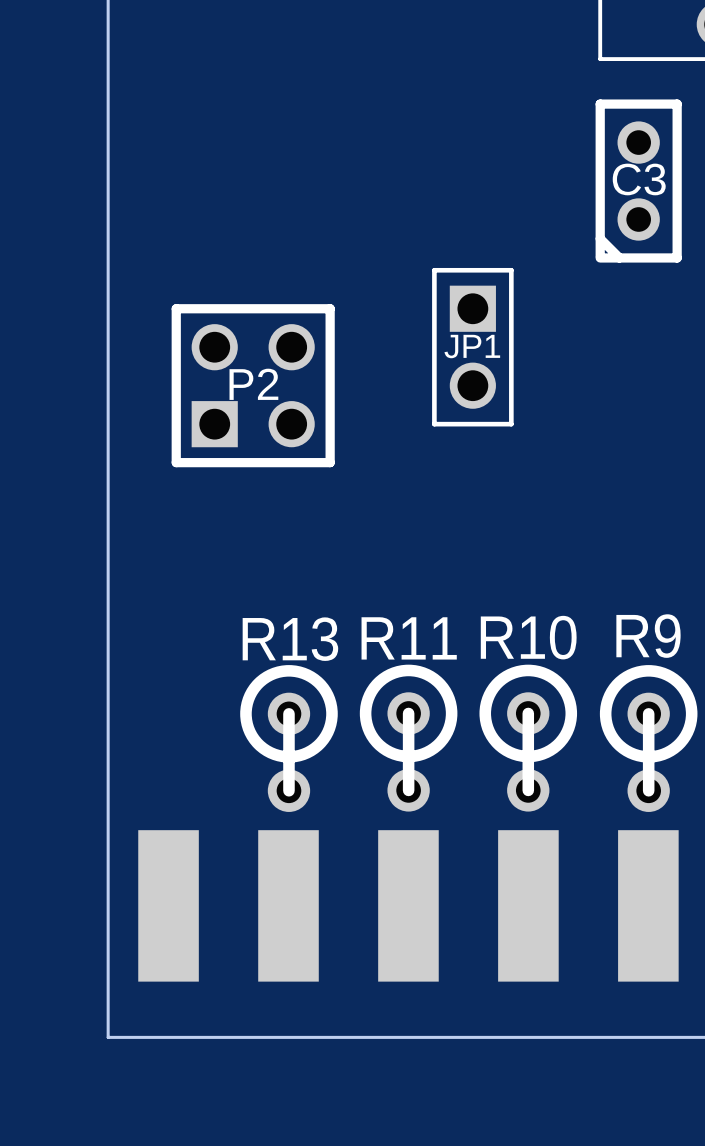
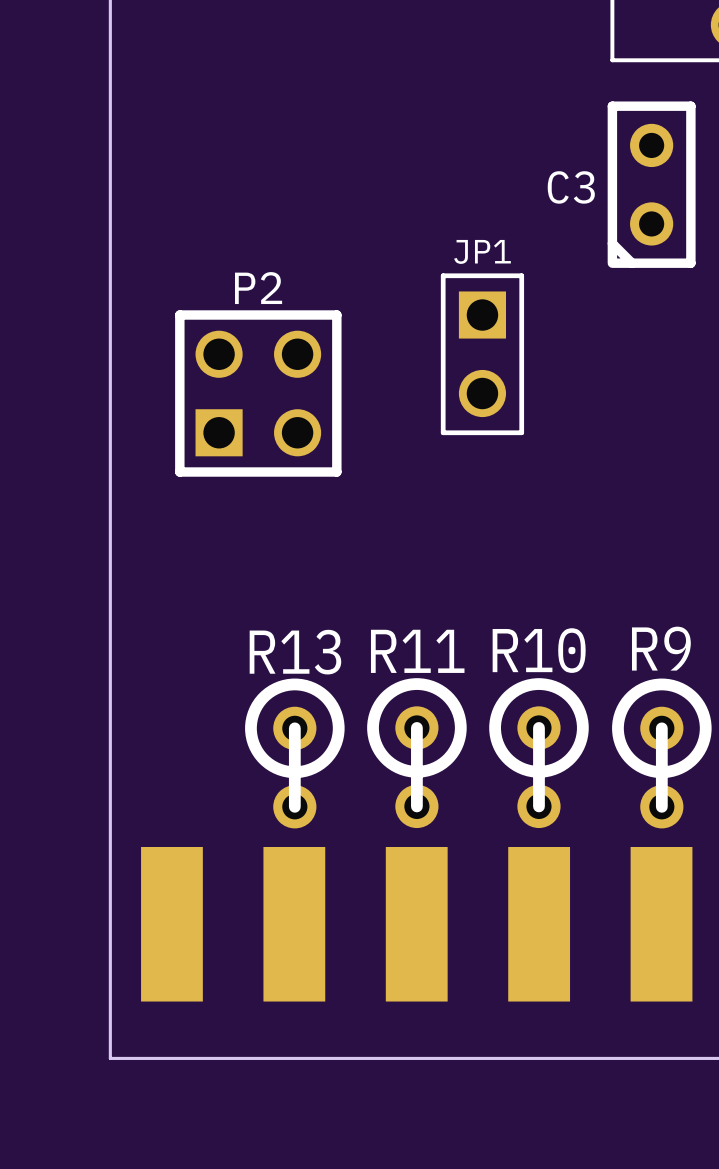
C3 name position: C3 (639, 179) -> C3 (571, 187)
JP1 name position: JP1 (472, 346) -> JP1 (482, 251)
P2 name position: P2 (253, 384) -> P2 (258, 288)

